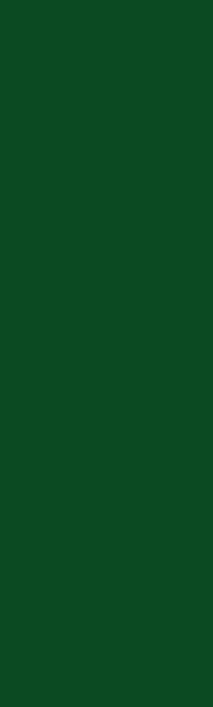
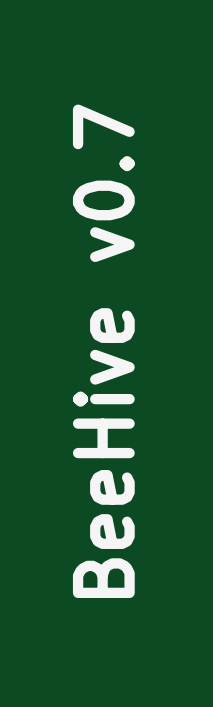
text: none -> BeeHive v0.7 (103, 351)

